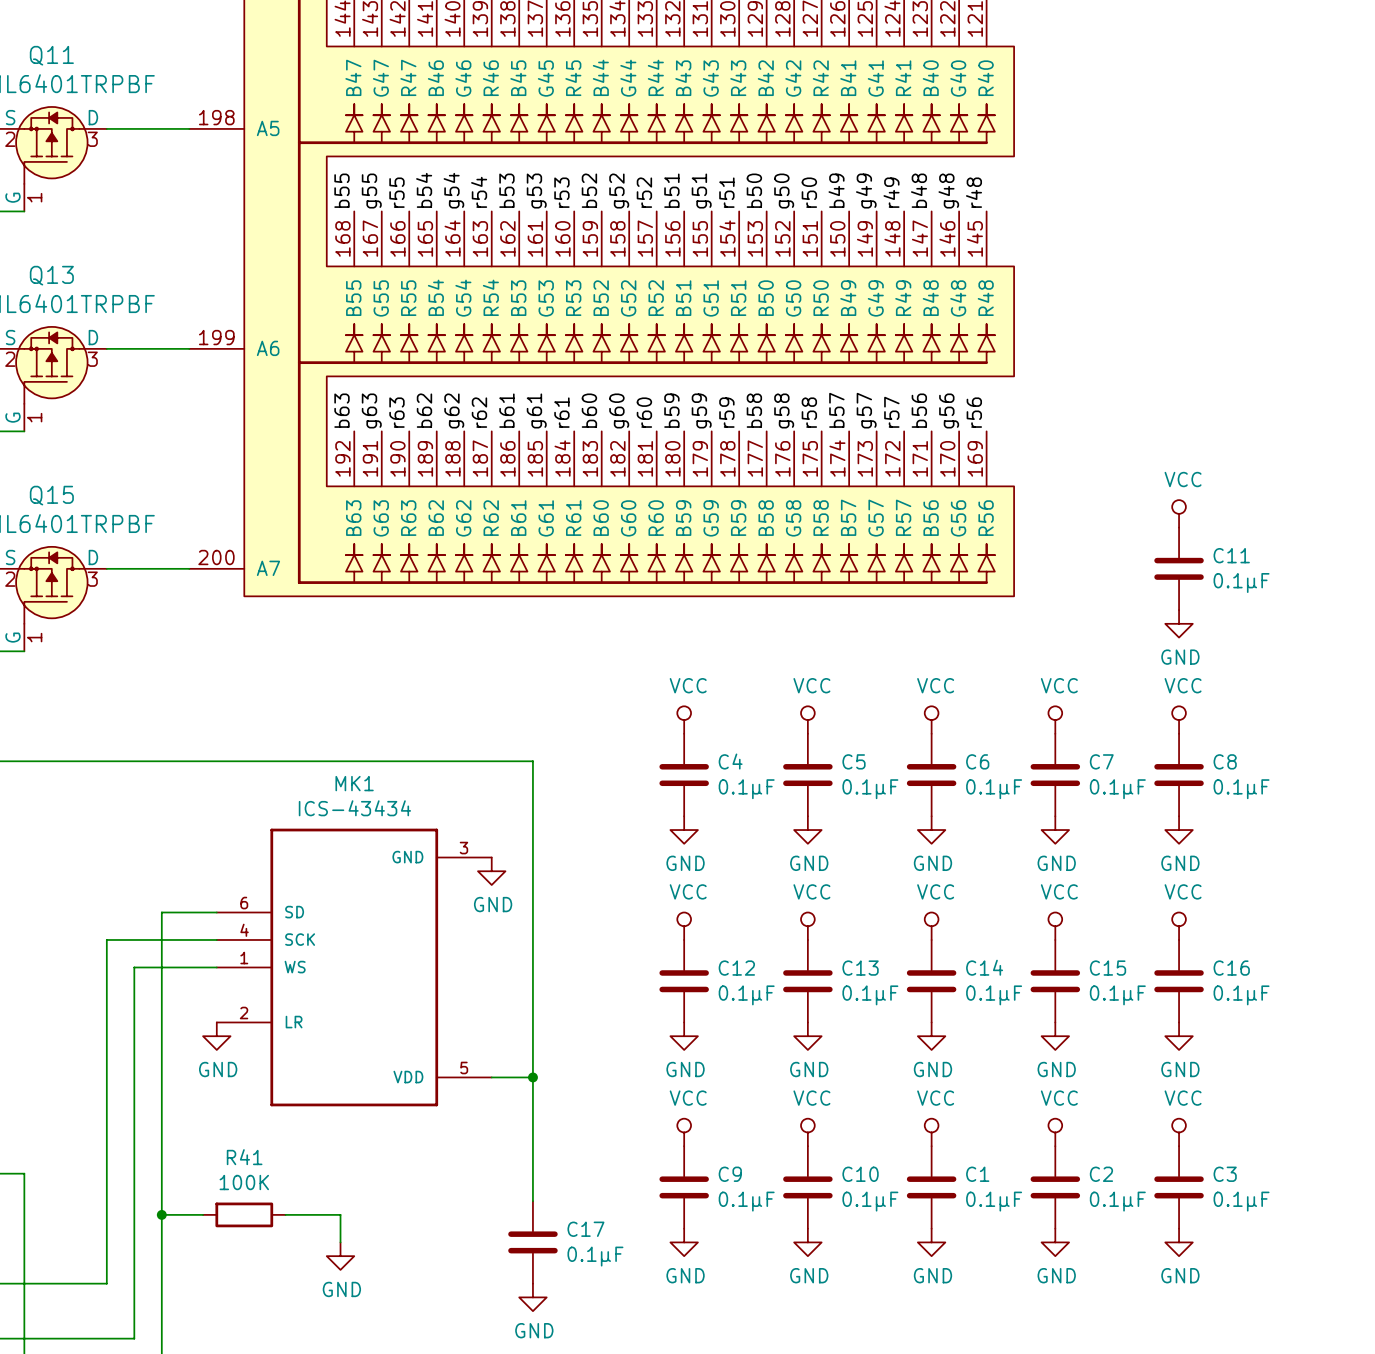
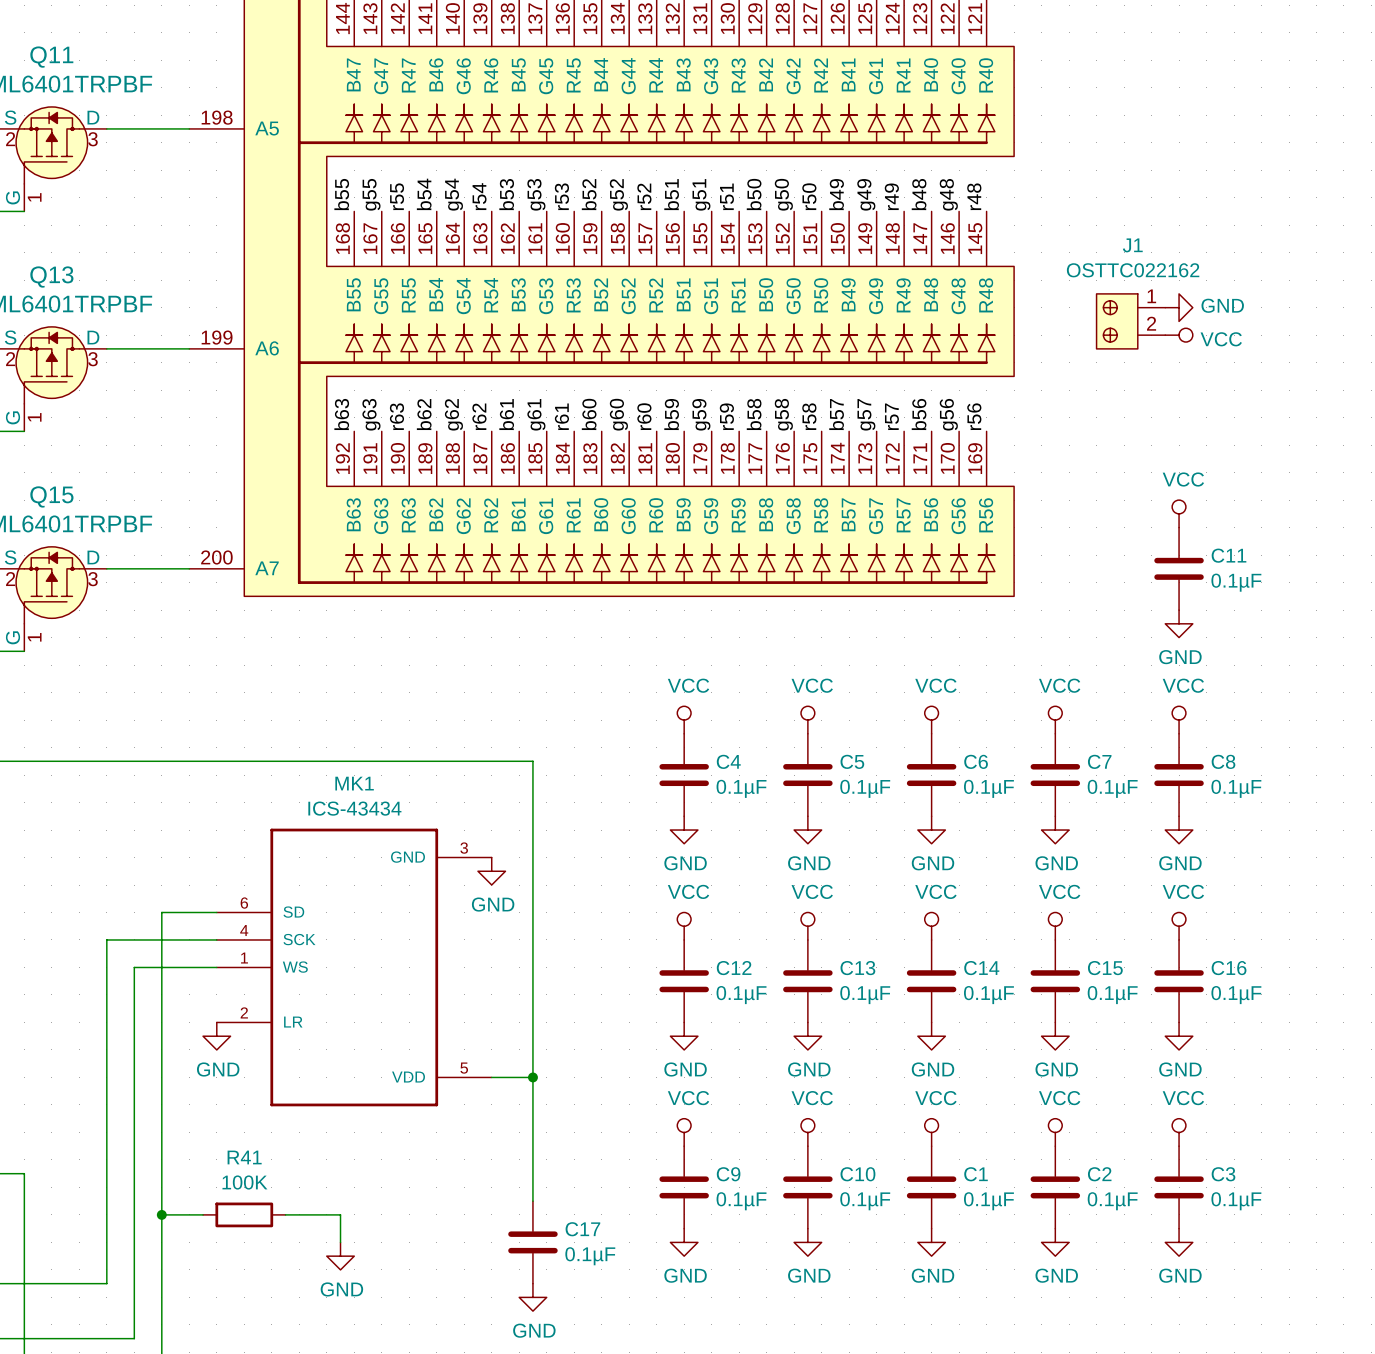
power symbol: none -> GND (1179, 307)
J1: none -> OSTTC022162 (1130, 321)
power symbol: none -> VCC (1179, 335)

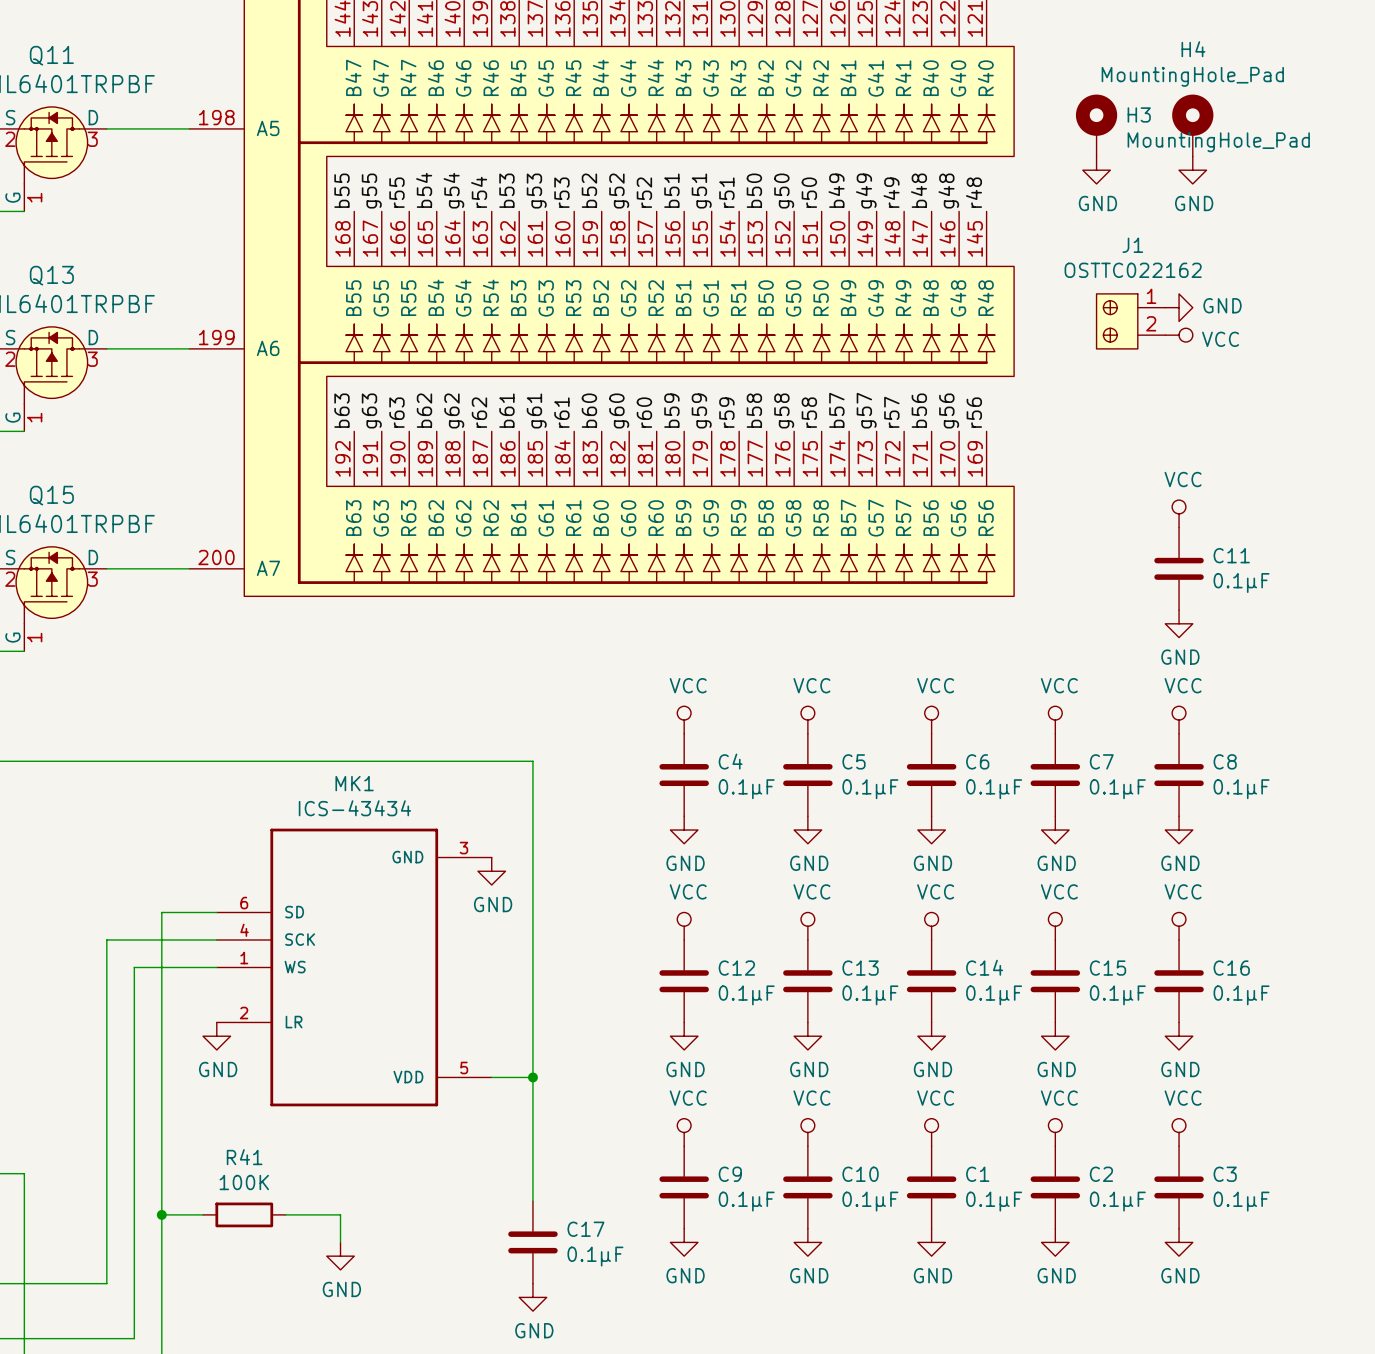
H3: none -> MountingHole_Pad (1096, 125)
H4: none -> MountingHole_Pad (1192, 125)
power symbol: none -> GND (1096, 170)
power symbol: none -> GND (1192, 170)

